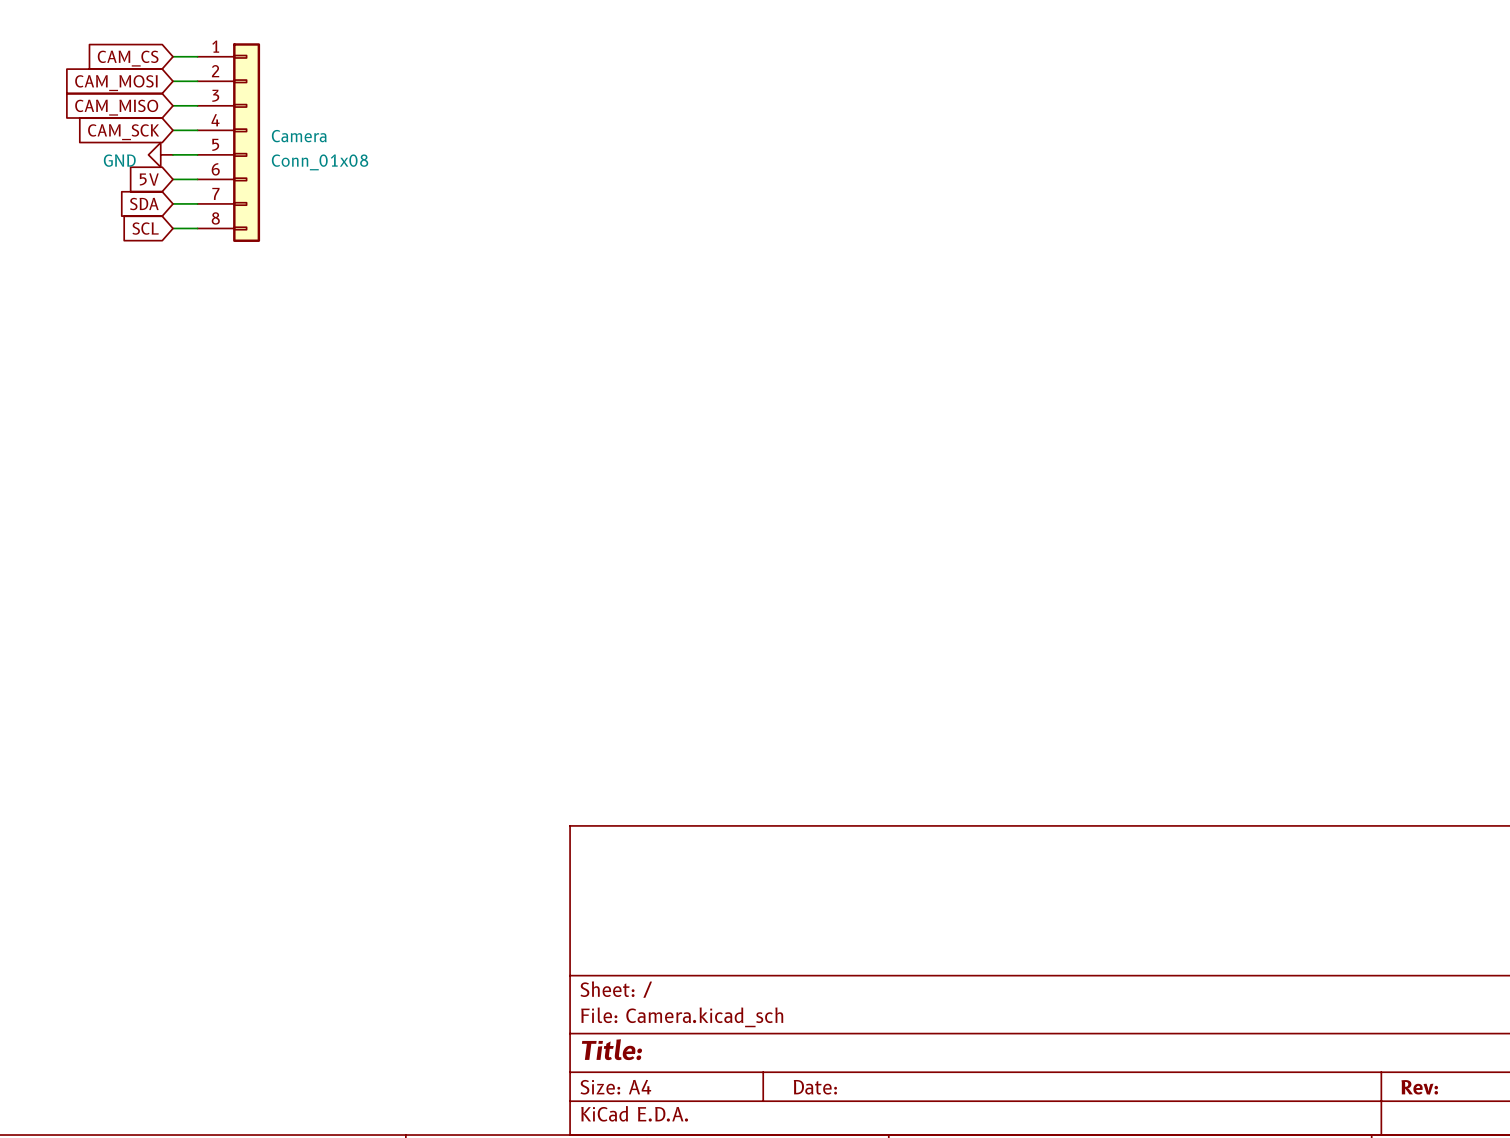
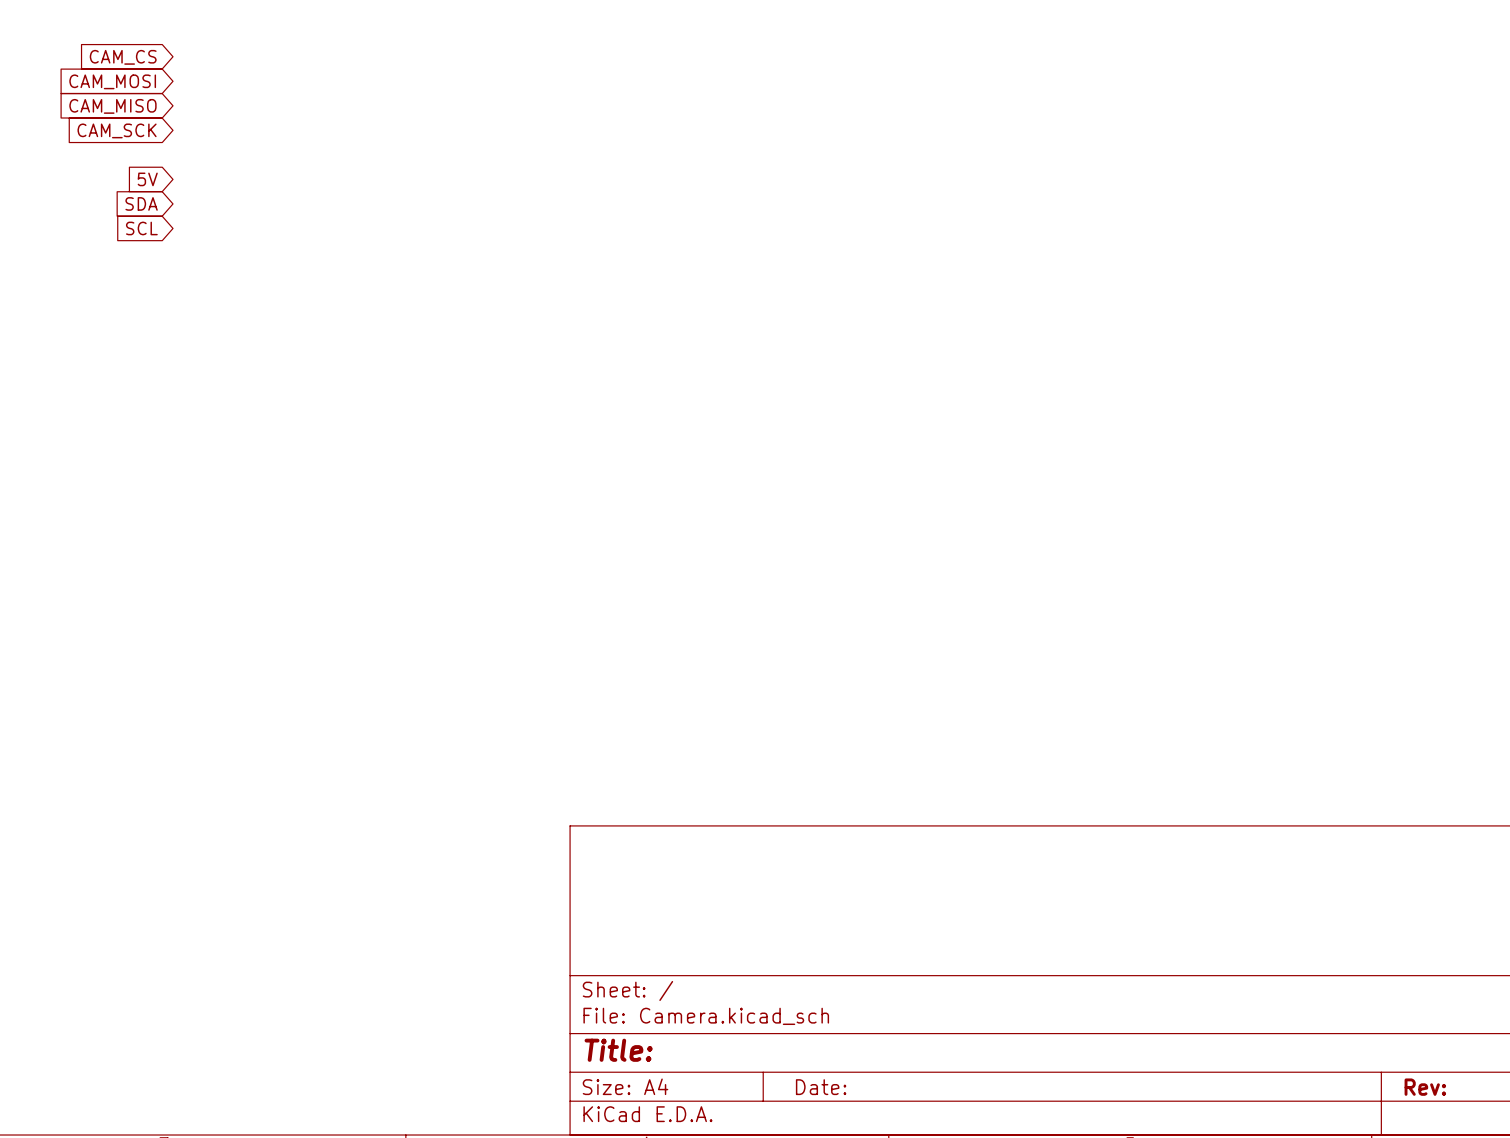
wire: (173, 56) (197, 56) -> none
wire: (173, 81) (197, 81) -> none
wire: (173, 105) (197, 105) -> none
wire: (173, 130) (197, 130) -> none
Camera: Conn_01x08 (228, 142) -> none
power symbol: GND (160, 154) -> none
wire: (173, 154) (197, 154) -> none
wire: (173, 179) (197, 179) -> none
wire: (173, 203) (197, 203) -> none
wire: (173, 228) (197, 228) -> none

